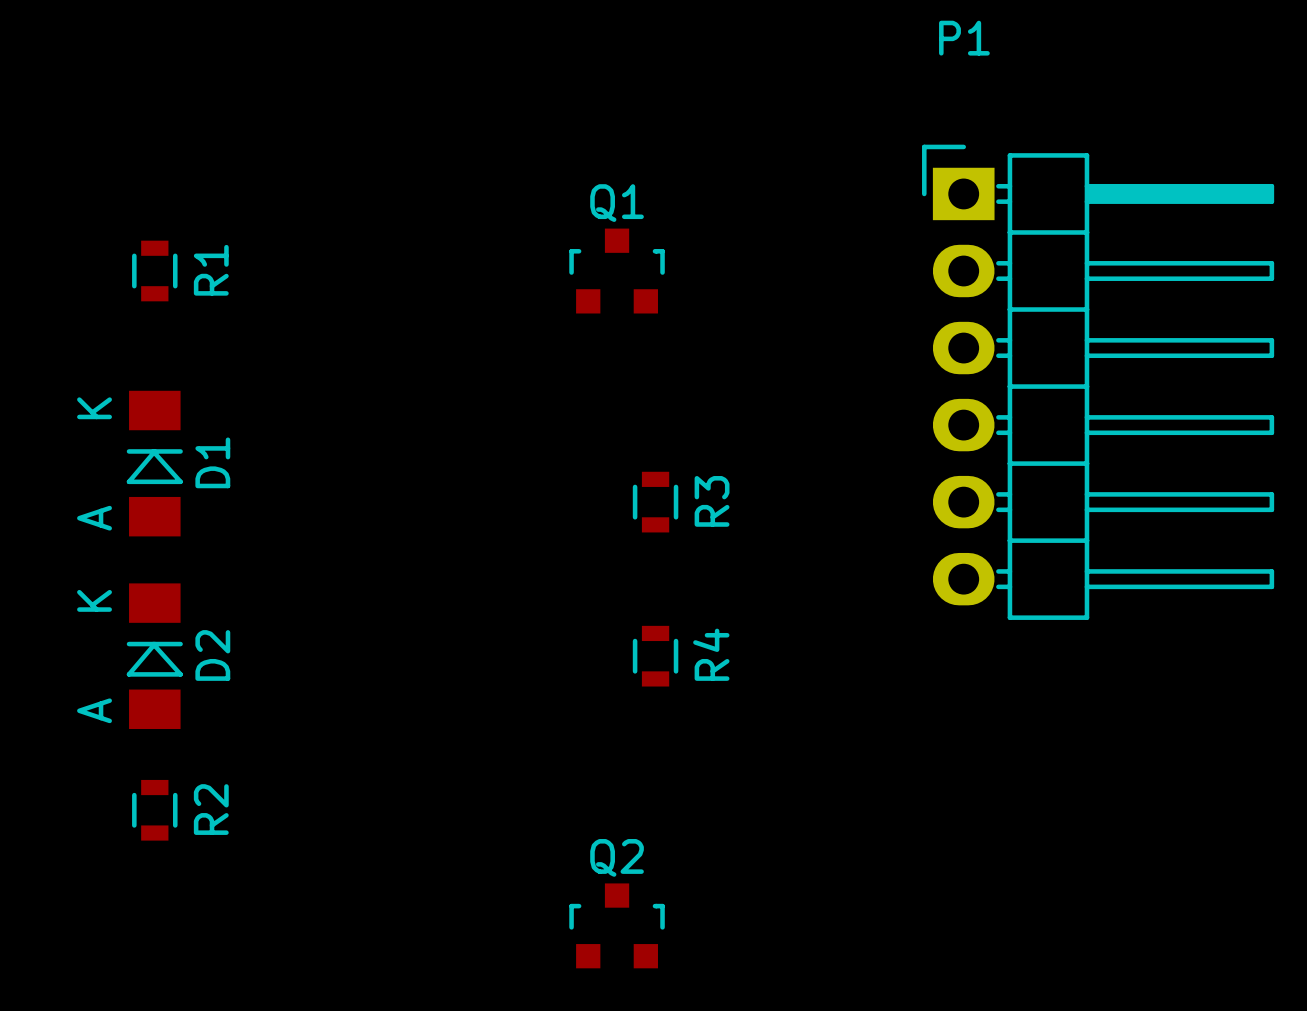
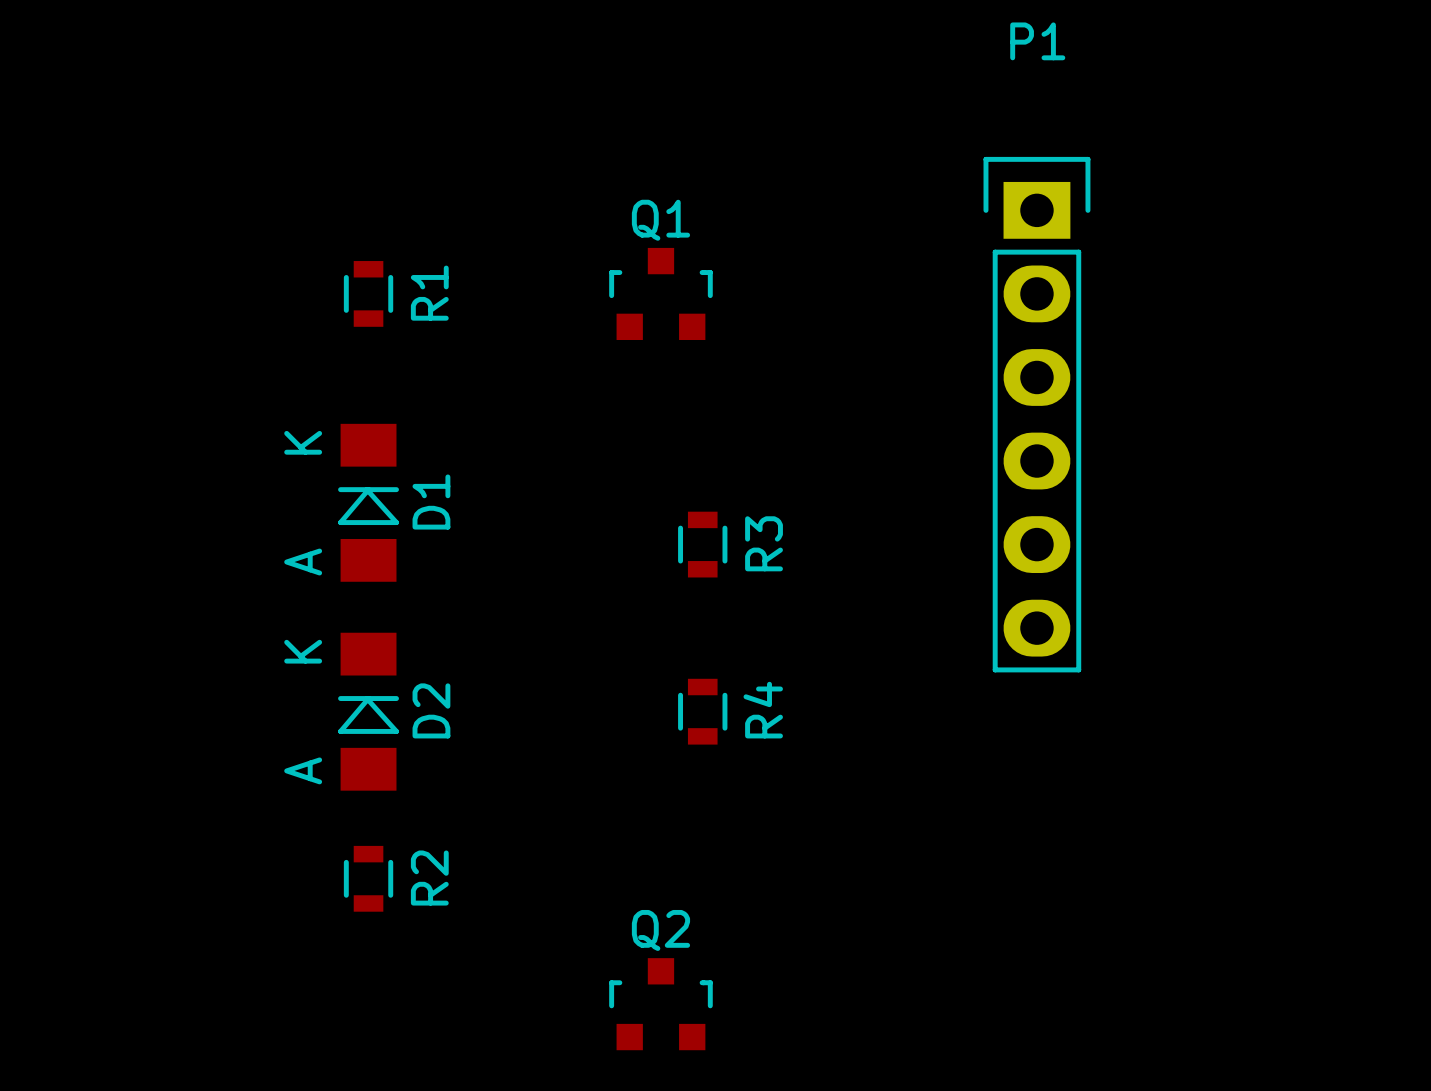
P1 footprint: [922, 144, 1275, 620] -> [983, 156, 1091, 673]
R1 position: (154, 271) -> (368, 293)
D1 position: (154, 463) -> (368, 502)
D2 position: (154, 656) -> (368, 711)
R2 position: (154, 810) -> (368, 878)

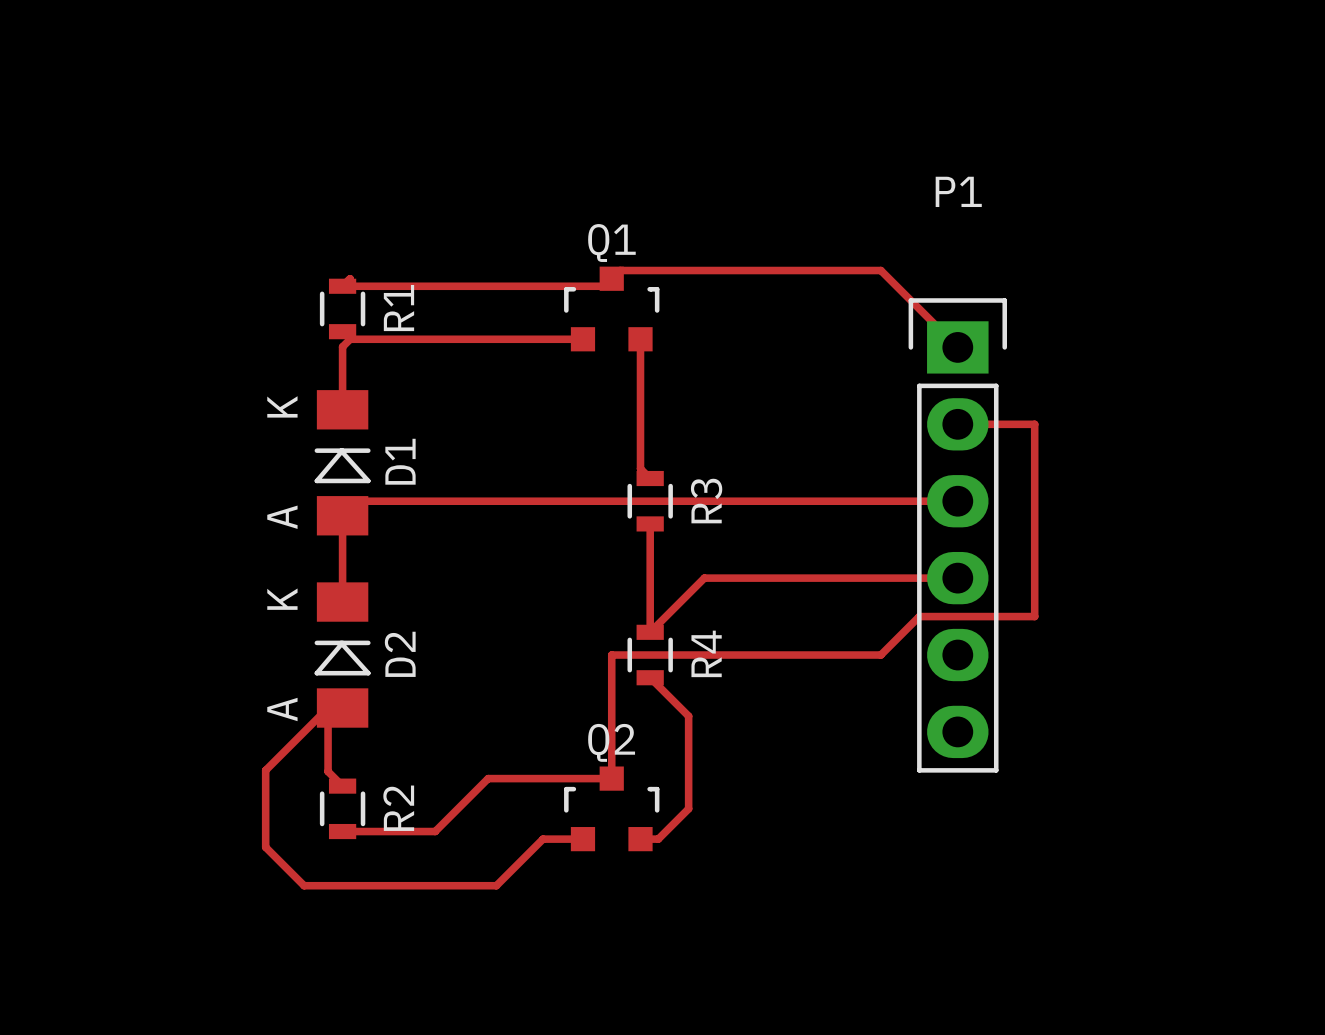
R1 position: (368, 293) -> (342, 308)
Q1 position: (660, 293) -> (611, 309)
top track: none -> (350, 278) (342, 286) (604, 286) (619, 270) (880, 270) (957, 347)
top track: none -> (582, 339) (350, 339) (342, 346) (342, 409)
top track: none -> (640, 339) (640, 468) (650, 478)
P1 position: (1036, 414) -> (957, 535)
top track: none -> (957, 424) (1034, 424) (1034, 616) (919, 616) (880, 655) (611, 655) (611, 778) (488, 778) (435, 831) (342, 831)
top track: none -> (957, 501) (357, 501) (342, 515) (342, 602)
top track: none -> (650, 523) (650, 632) (704, 578) (957, 578)
top track: none -> (650, 677) (688, 716) (688, 808) (658, 839) (640, 839)
top track: none -> (342, 786) (328, 771) (328, 708) (265, 770) (265, 847) (304, 885) (496, 885) (542, 839) (582, 839)
Q2 position: (660, 1004) -> (611, 808)

